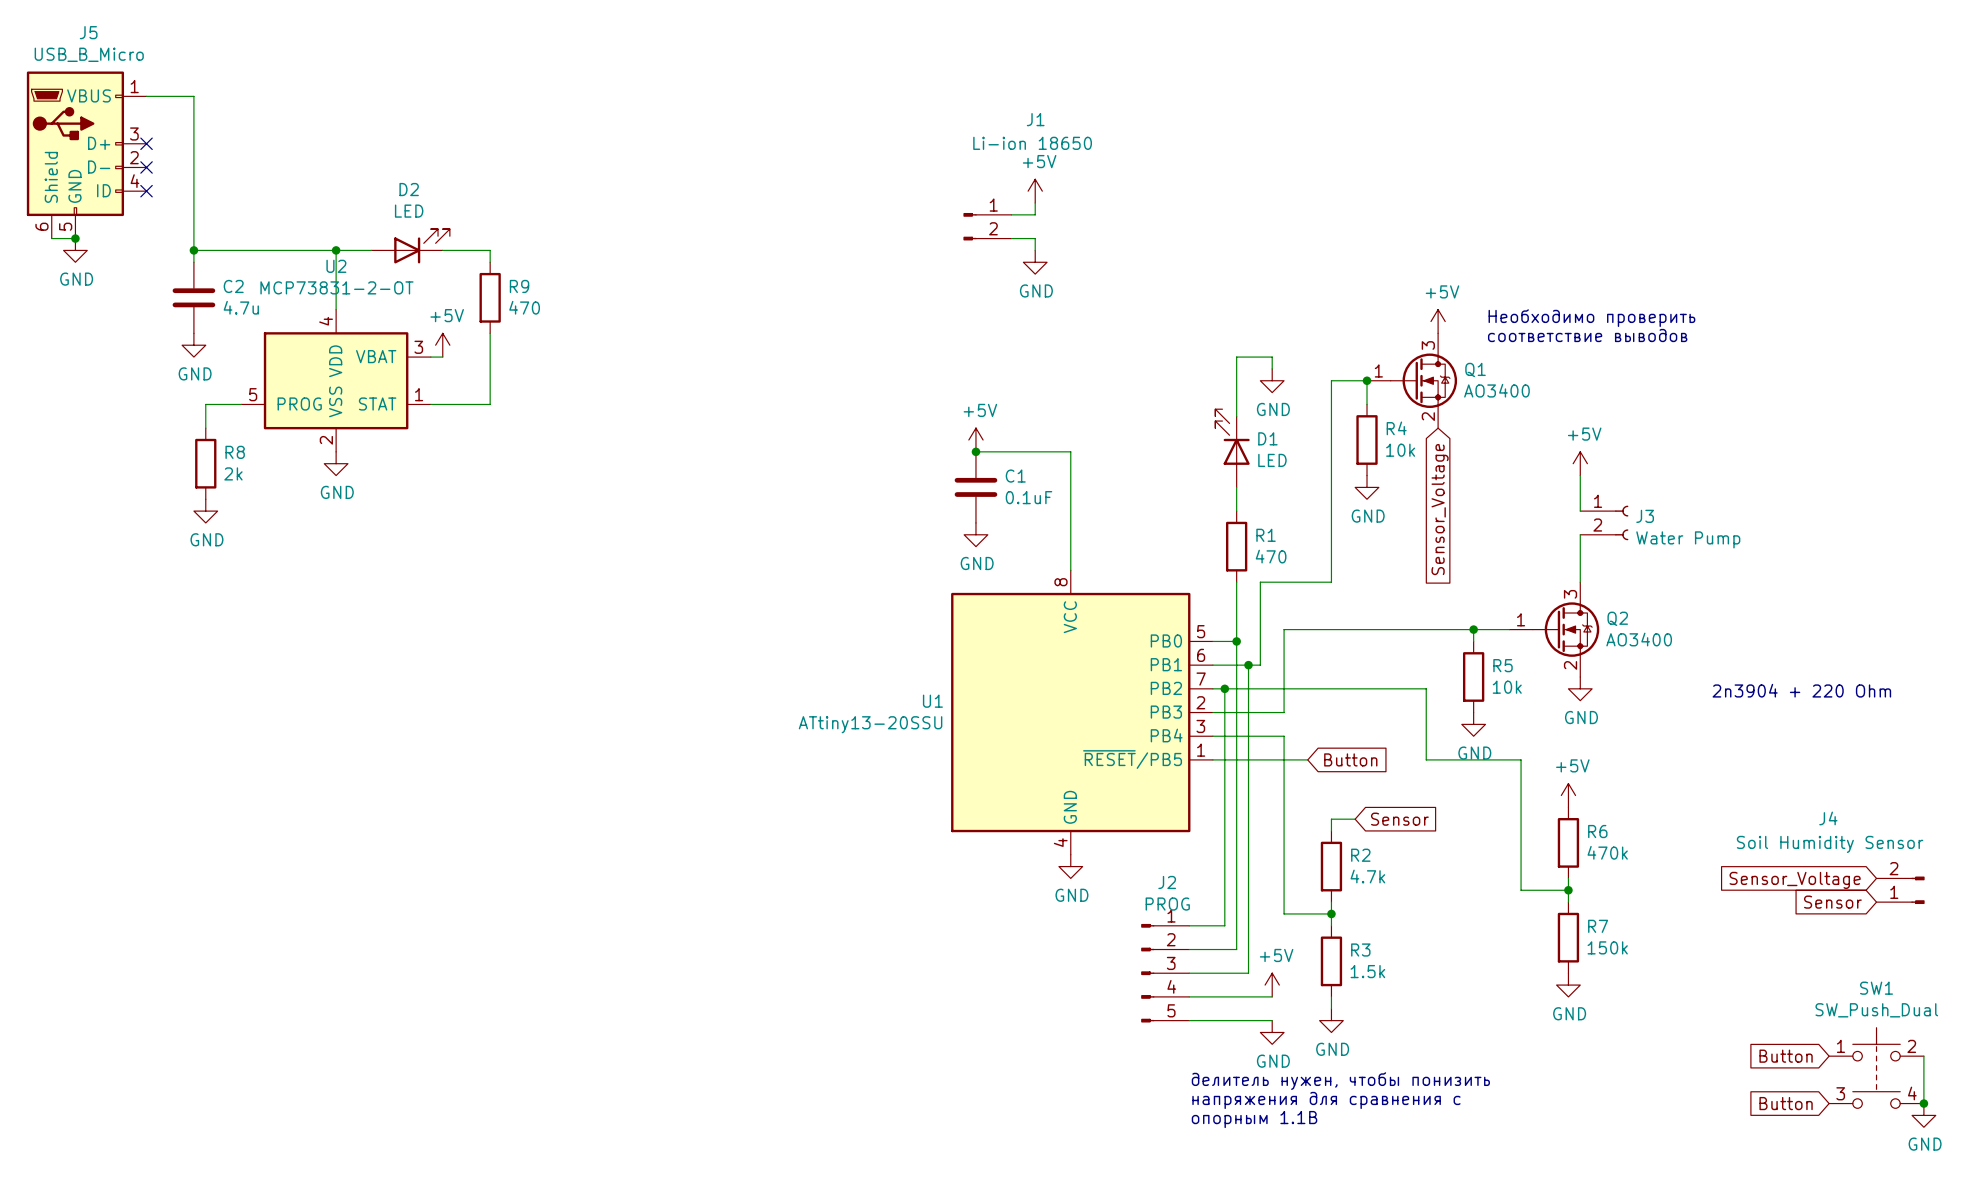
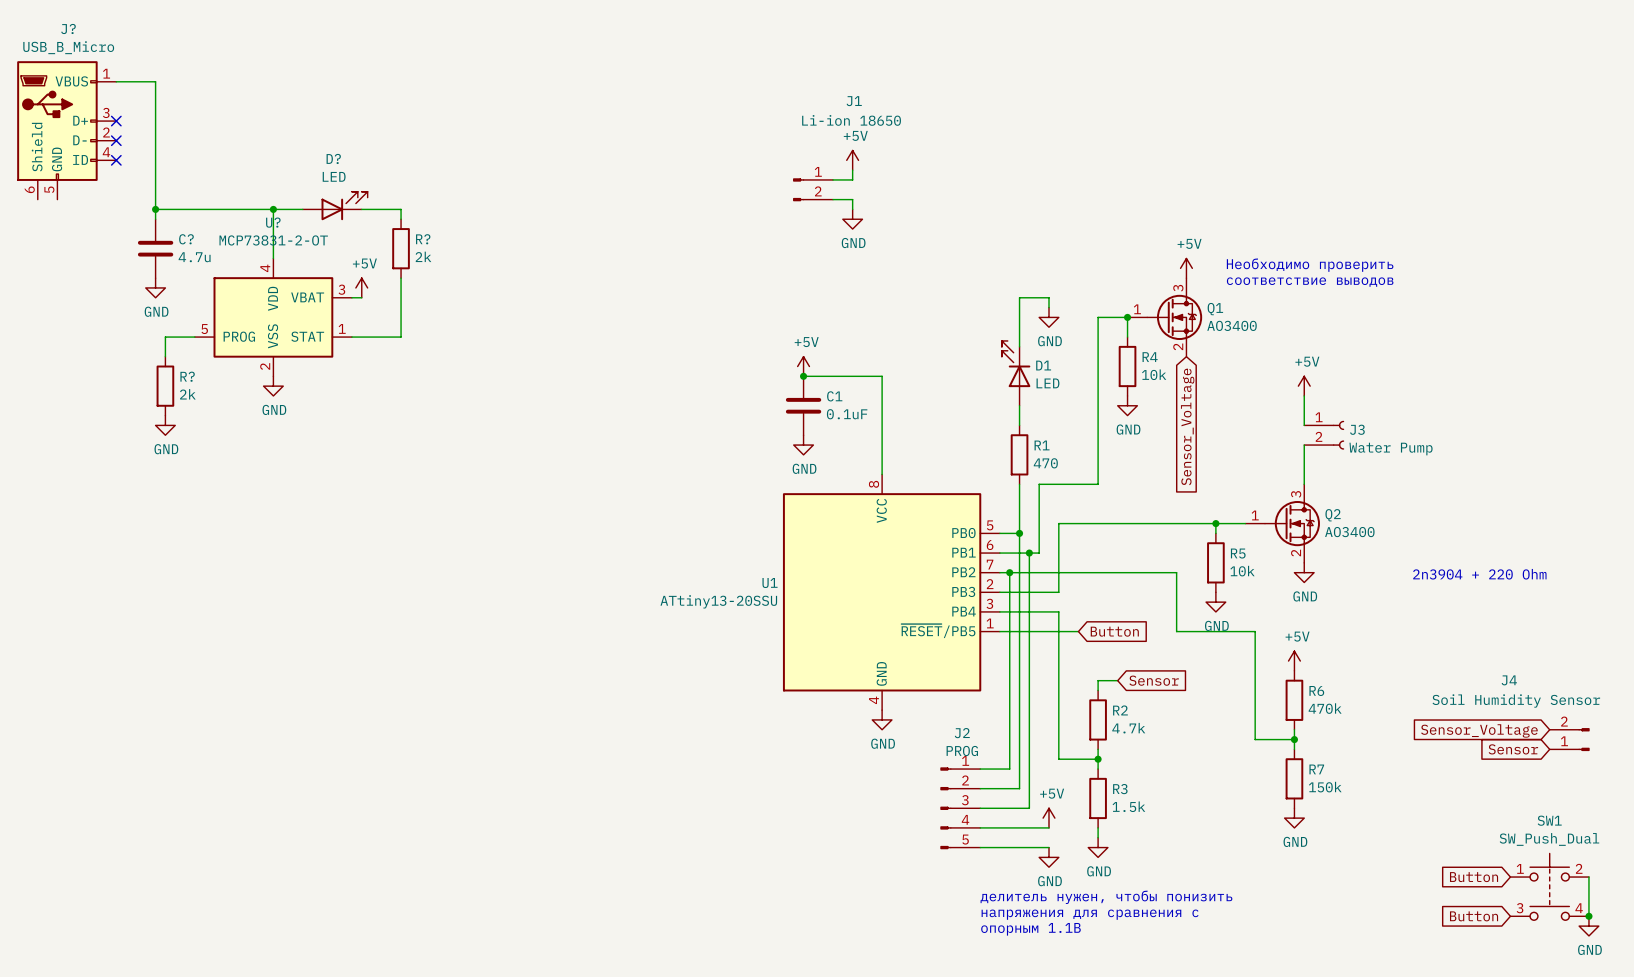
J5 name: J5 (88, 32) -> J? (68, 29)
D2 name: D2 (409, 189) -> D? (333, 158)
wire: (51, 238) (75, 238) -> none
junction: (75, 238) -> none
power symbol: GND (75, 250) -> none
U2 name: U2 (336, 266) -> U? (273, 222)
C2 name: C2 (233, 286) -> C? (186, 239)
R9 name: R9 (519, 286) -> R? (423, 239)
R9 value: 470 (524, 307) -> 2k (423, 256)
R8 name: R8 (235, 452) -> R? (187, 376)

